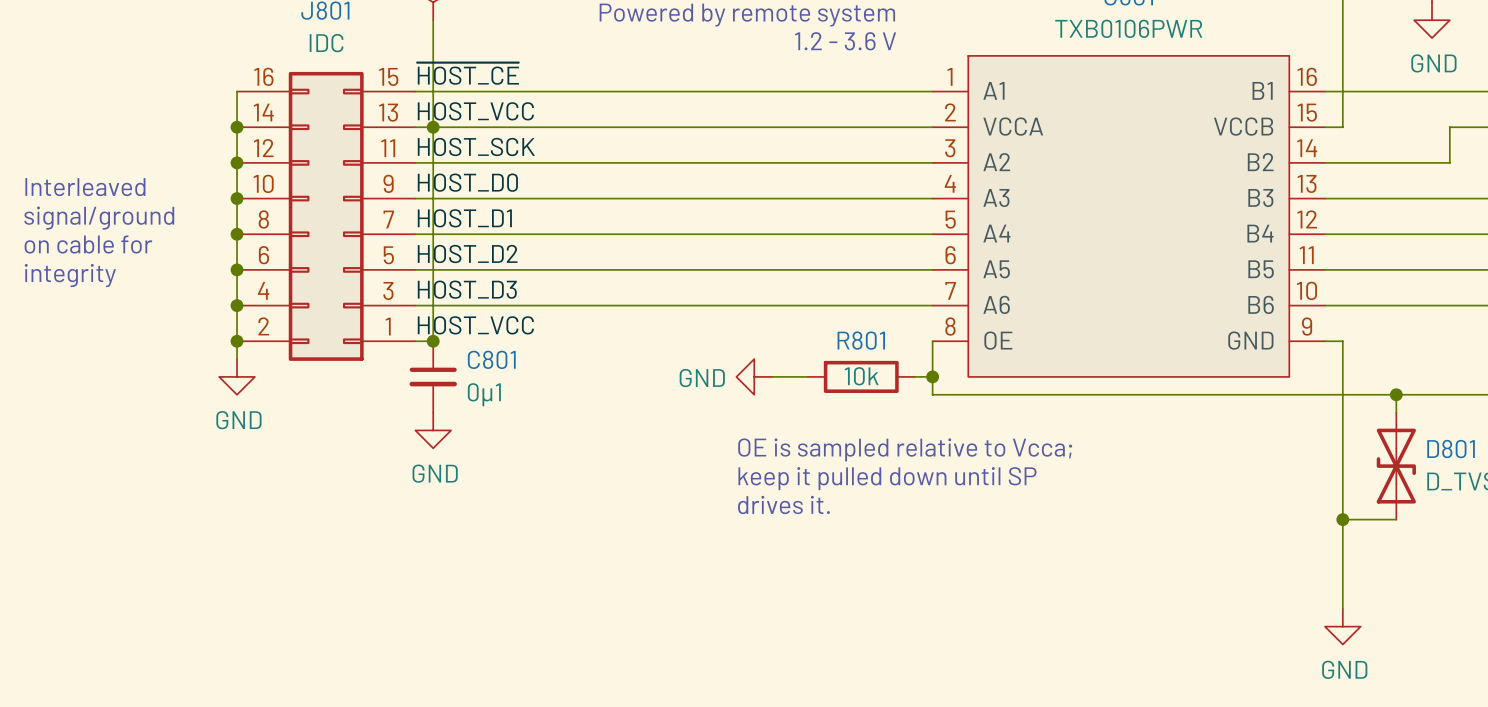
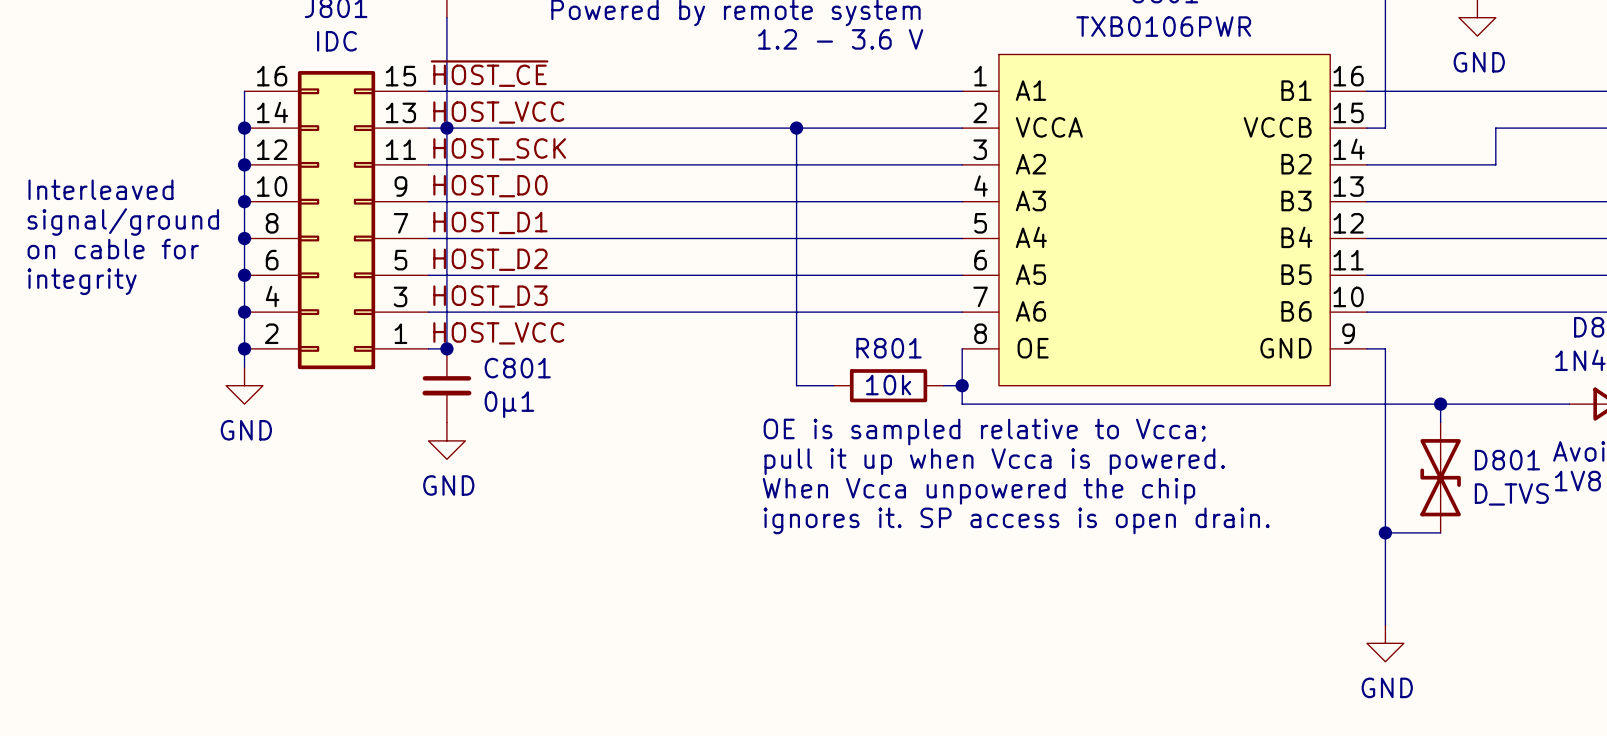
wire: none -> (796, 128) (796, 385)
junction: none -> (796, 128)
power symbol: GND (754, 376) -> none
text: none -> OE is sampled relative to Vcca; (984, 432)
text: OE is sampled relative to Vcca; (905, 449) -> pull it up when Vcca is powered. (994, 461)
text: keep it pulled down until SP (887, 478) -> When Vcca unpowered the chip (978, 491)
text: drives it. (783, 504) -> ignores it. SP access is open drain. (1016, 520)

